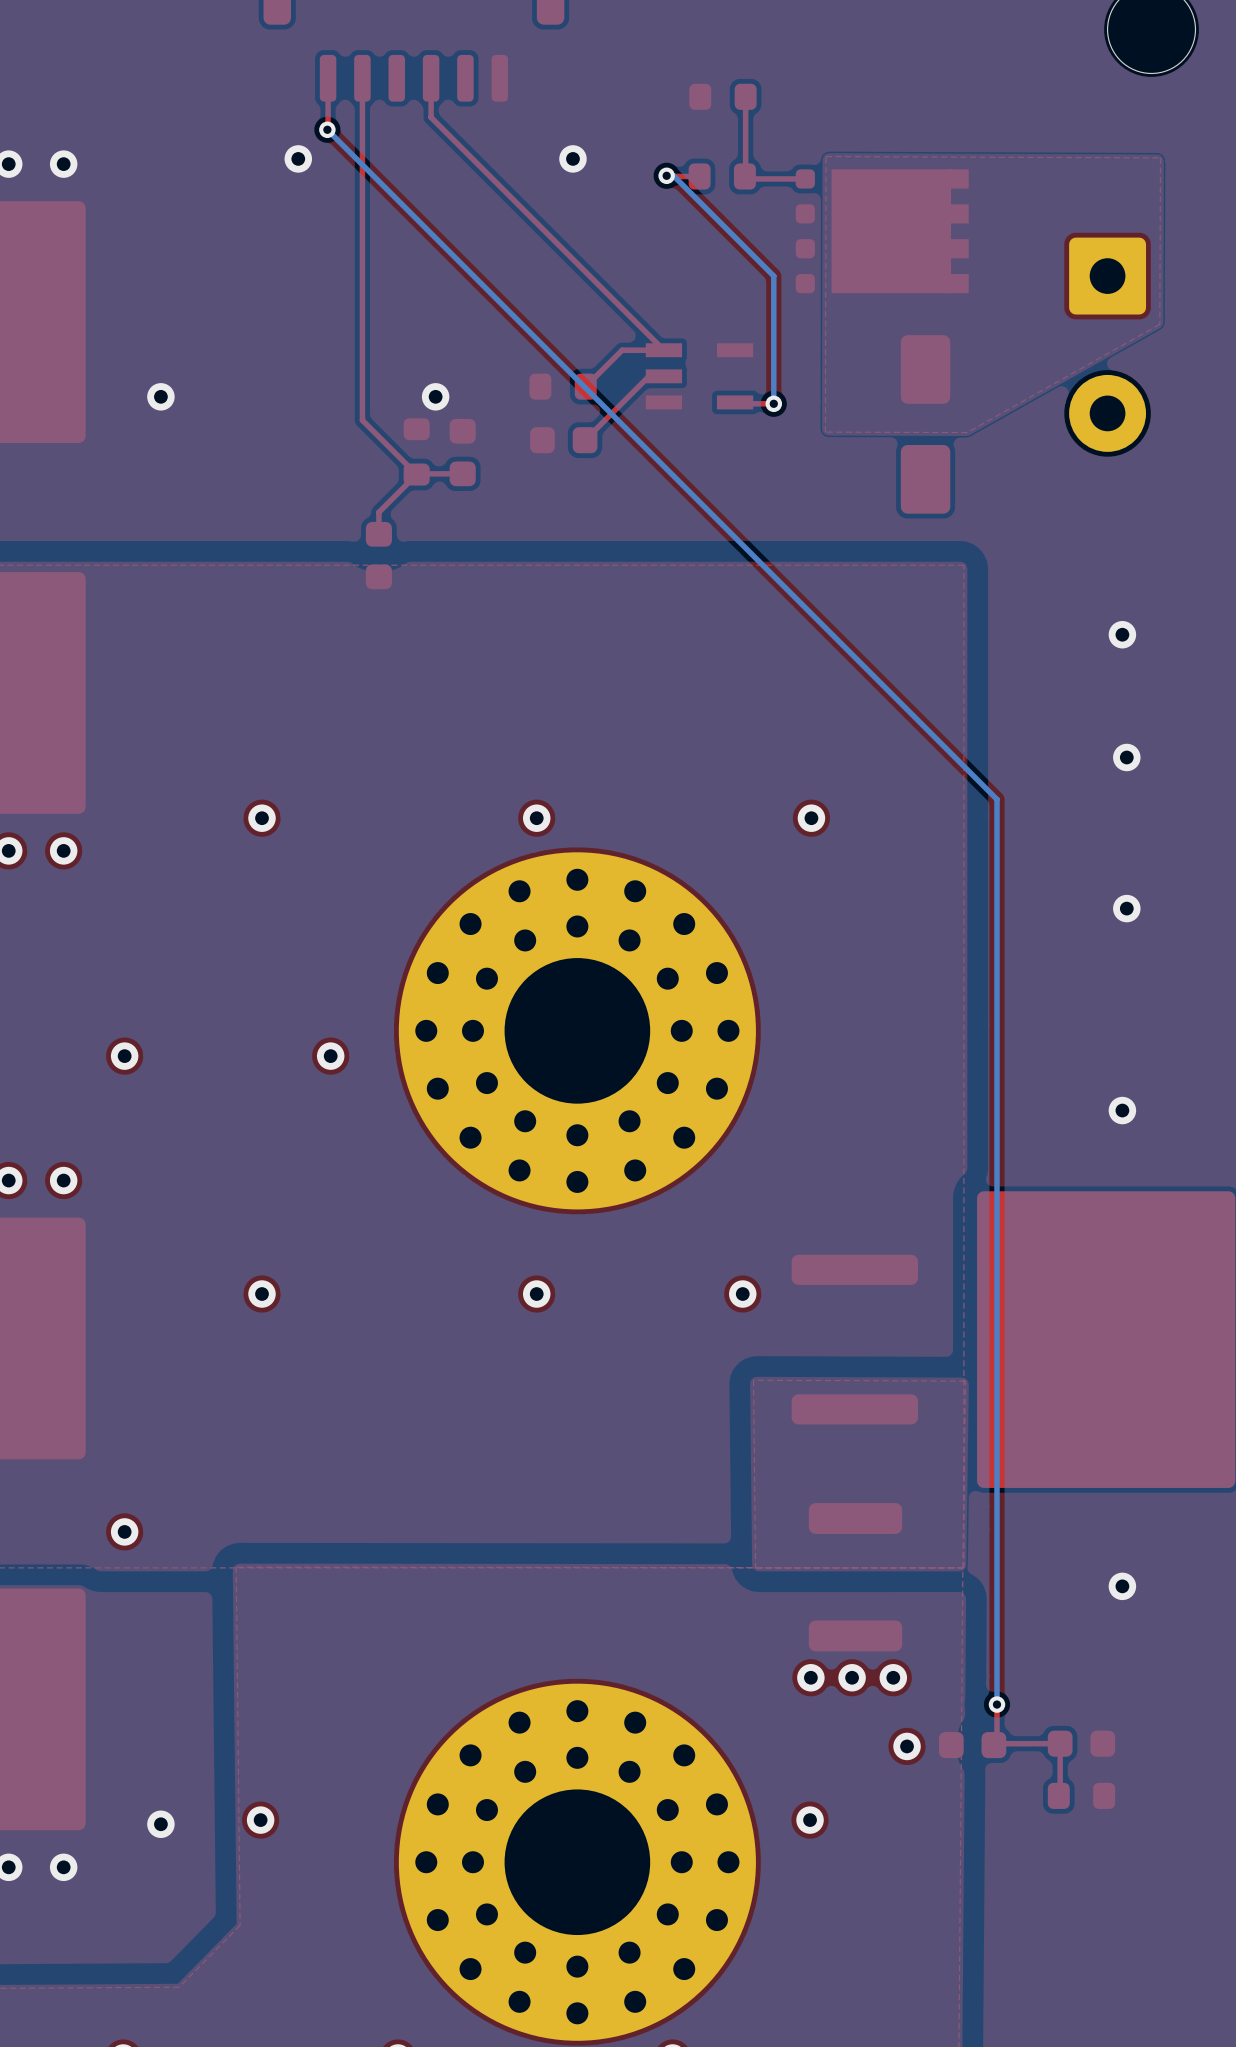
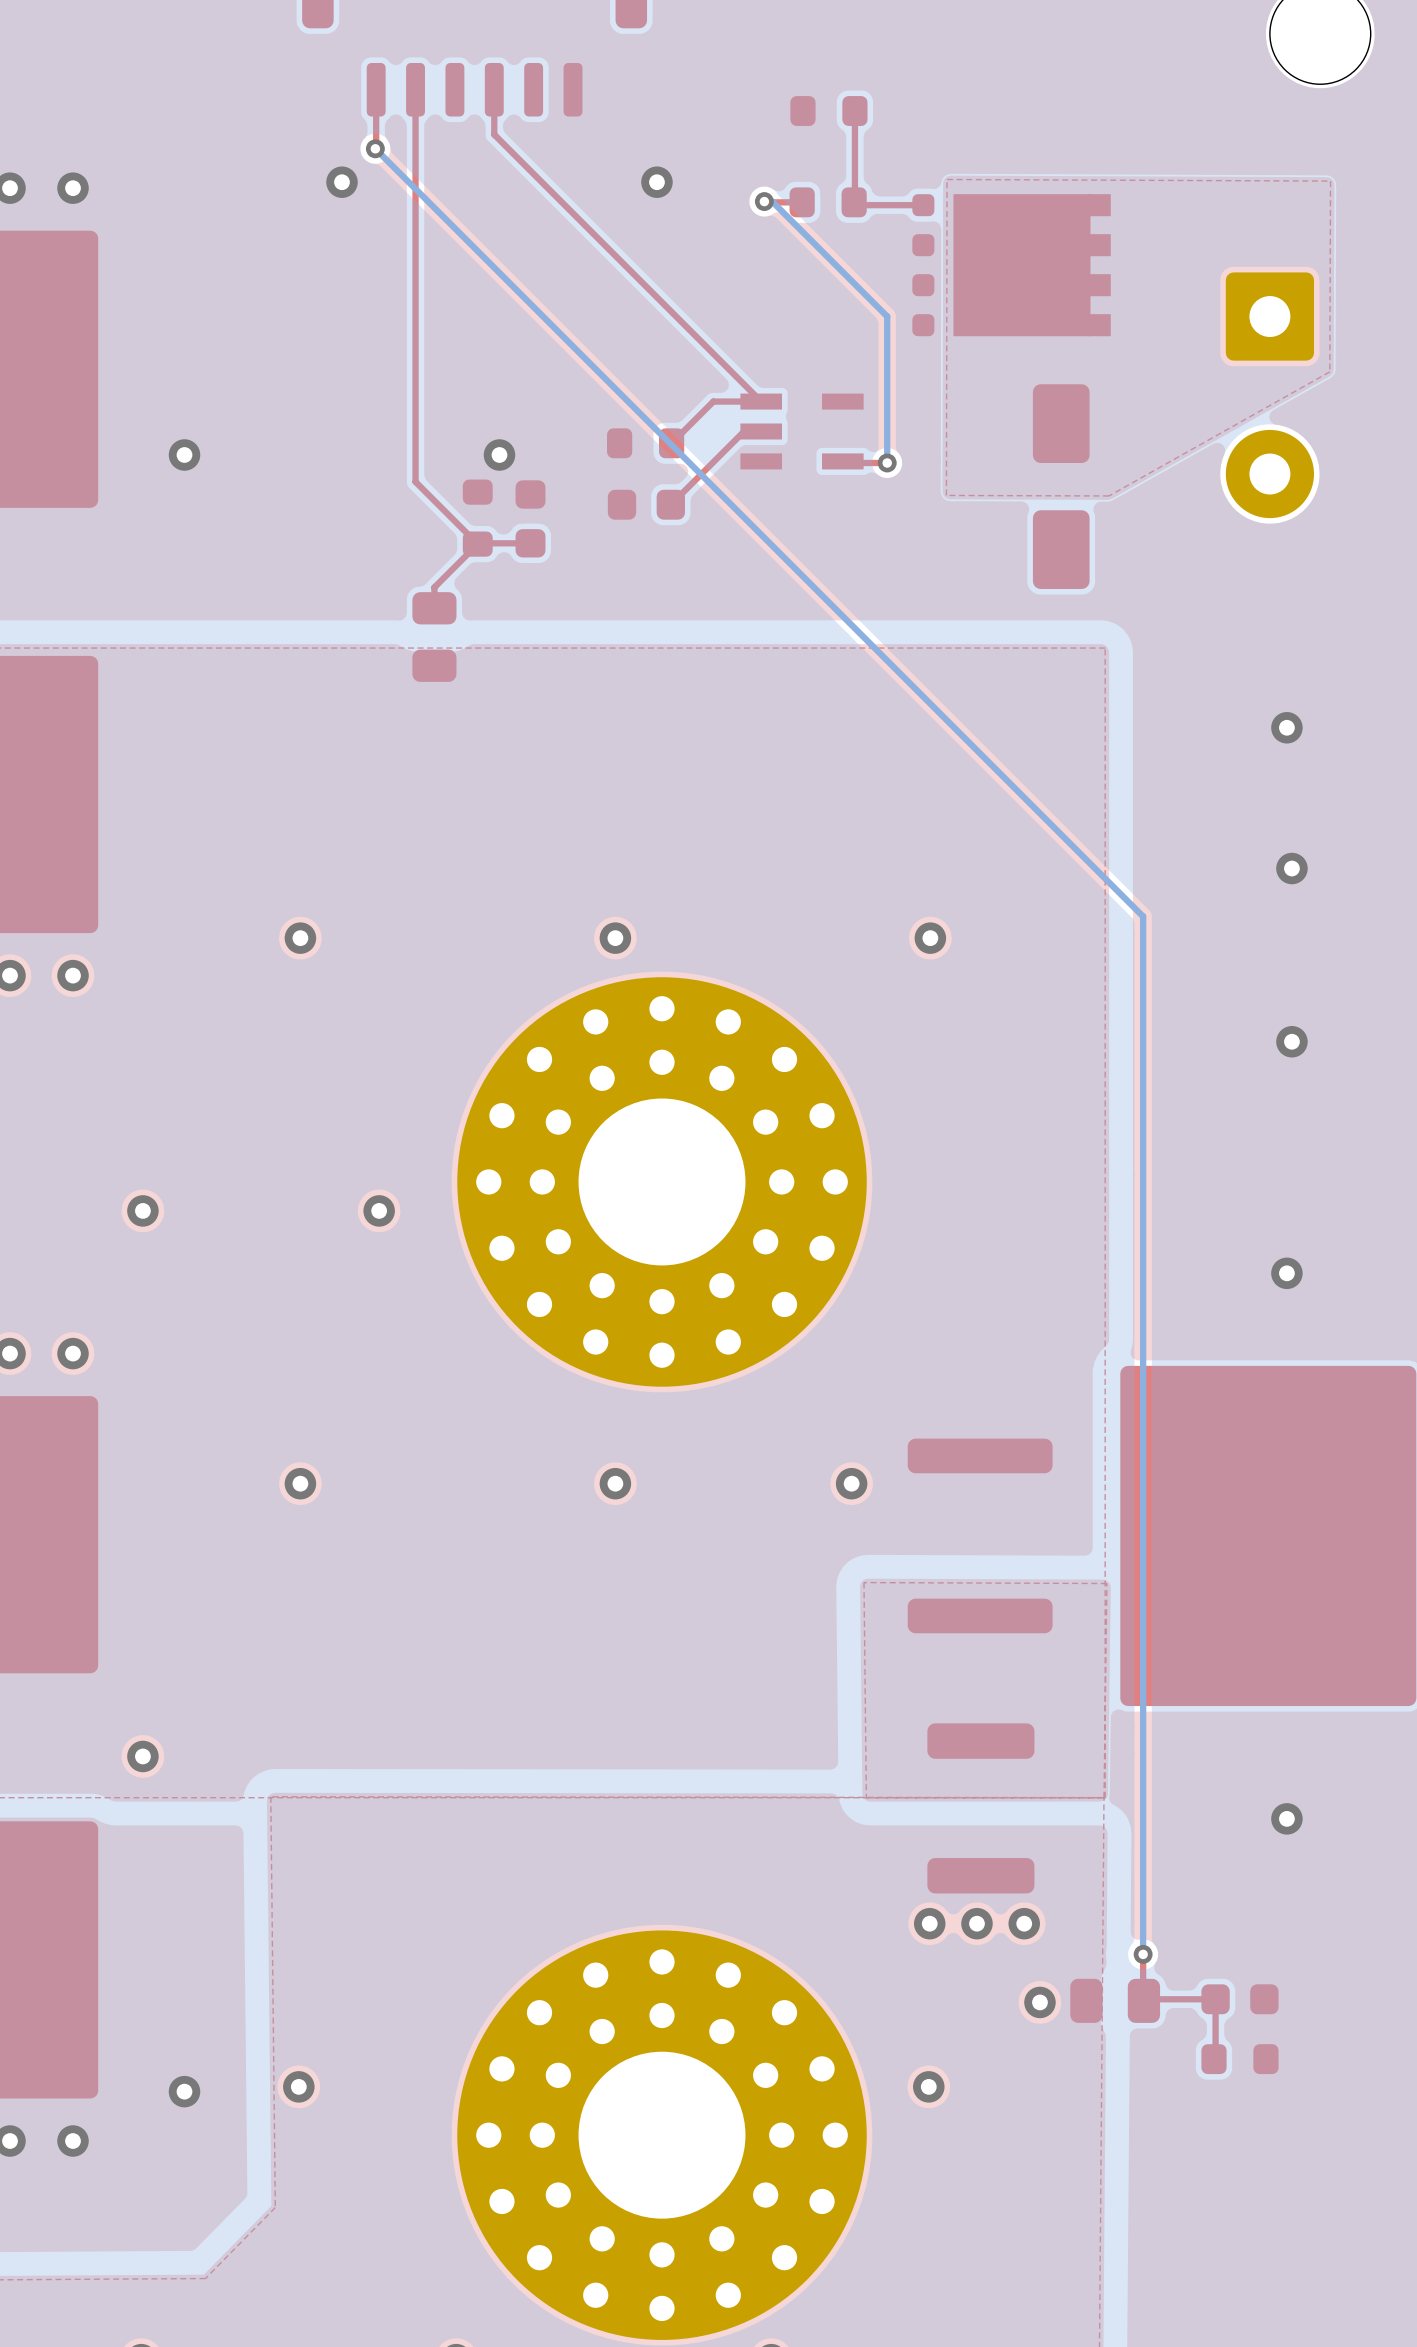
part footprint: [365, 521, 392, 590] -> [412, 592, 457, 682]
part footprint: [938, 1732, 1007, 1759] -> [1070, 1978, 1161, 2023]

